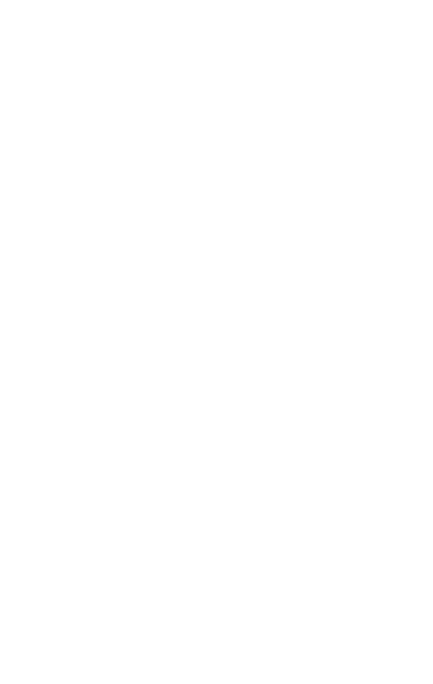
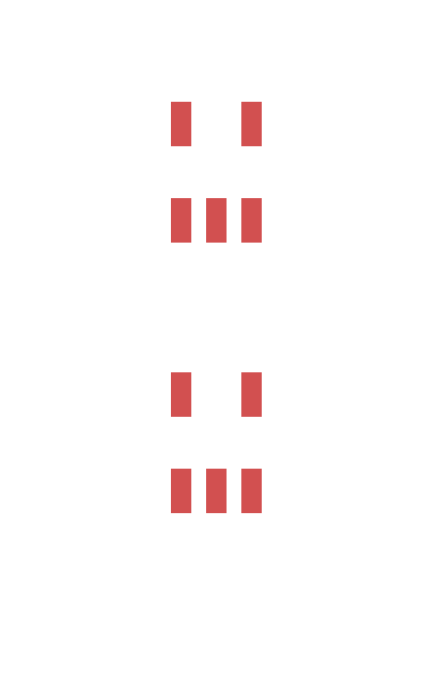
part: none -> (216, 172)
part: none -> (216, 442)

